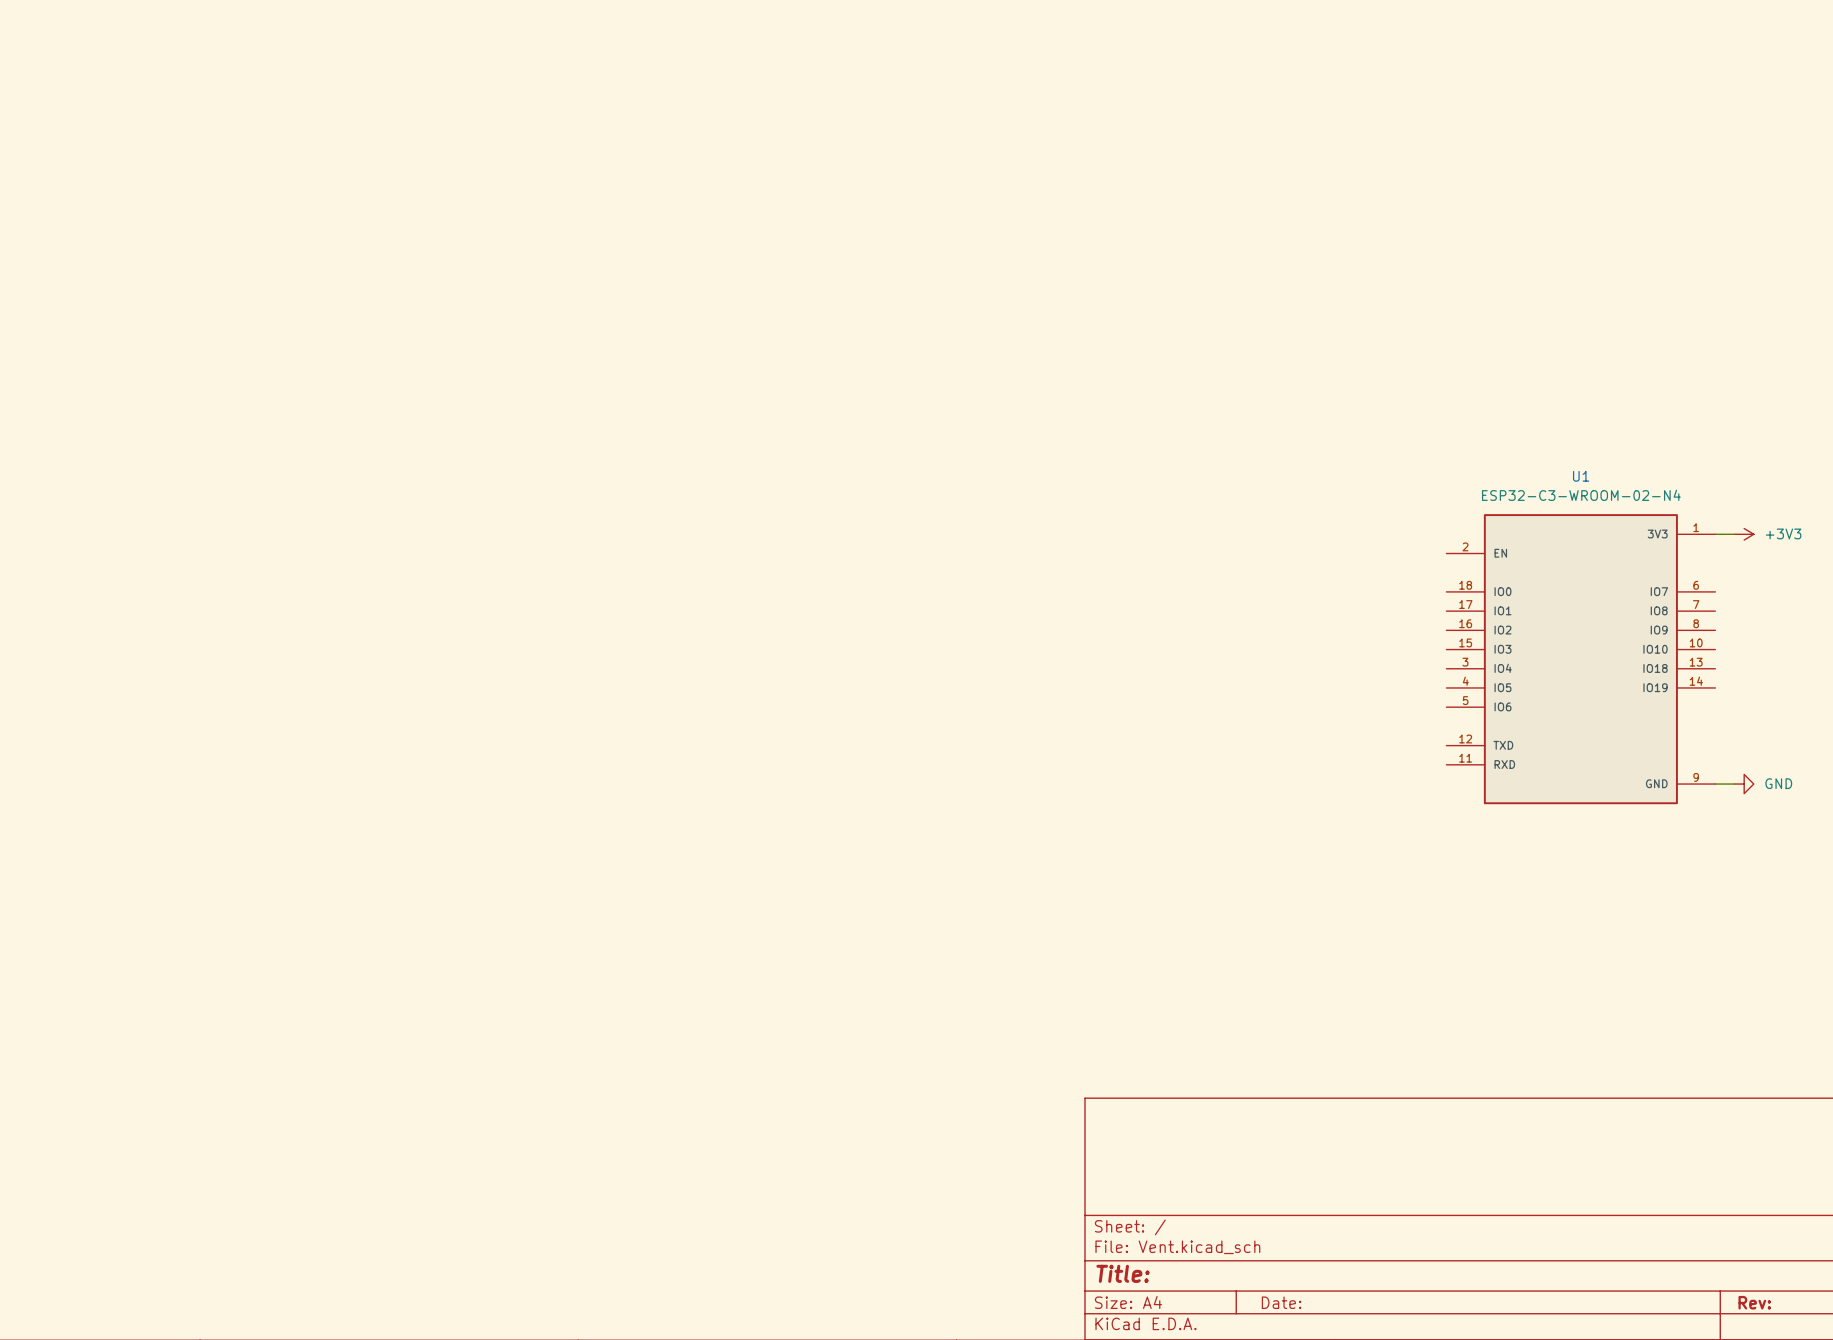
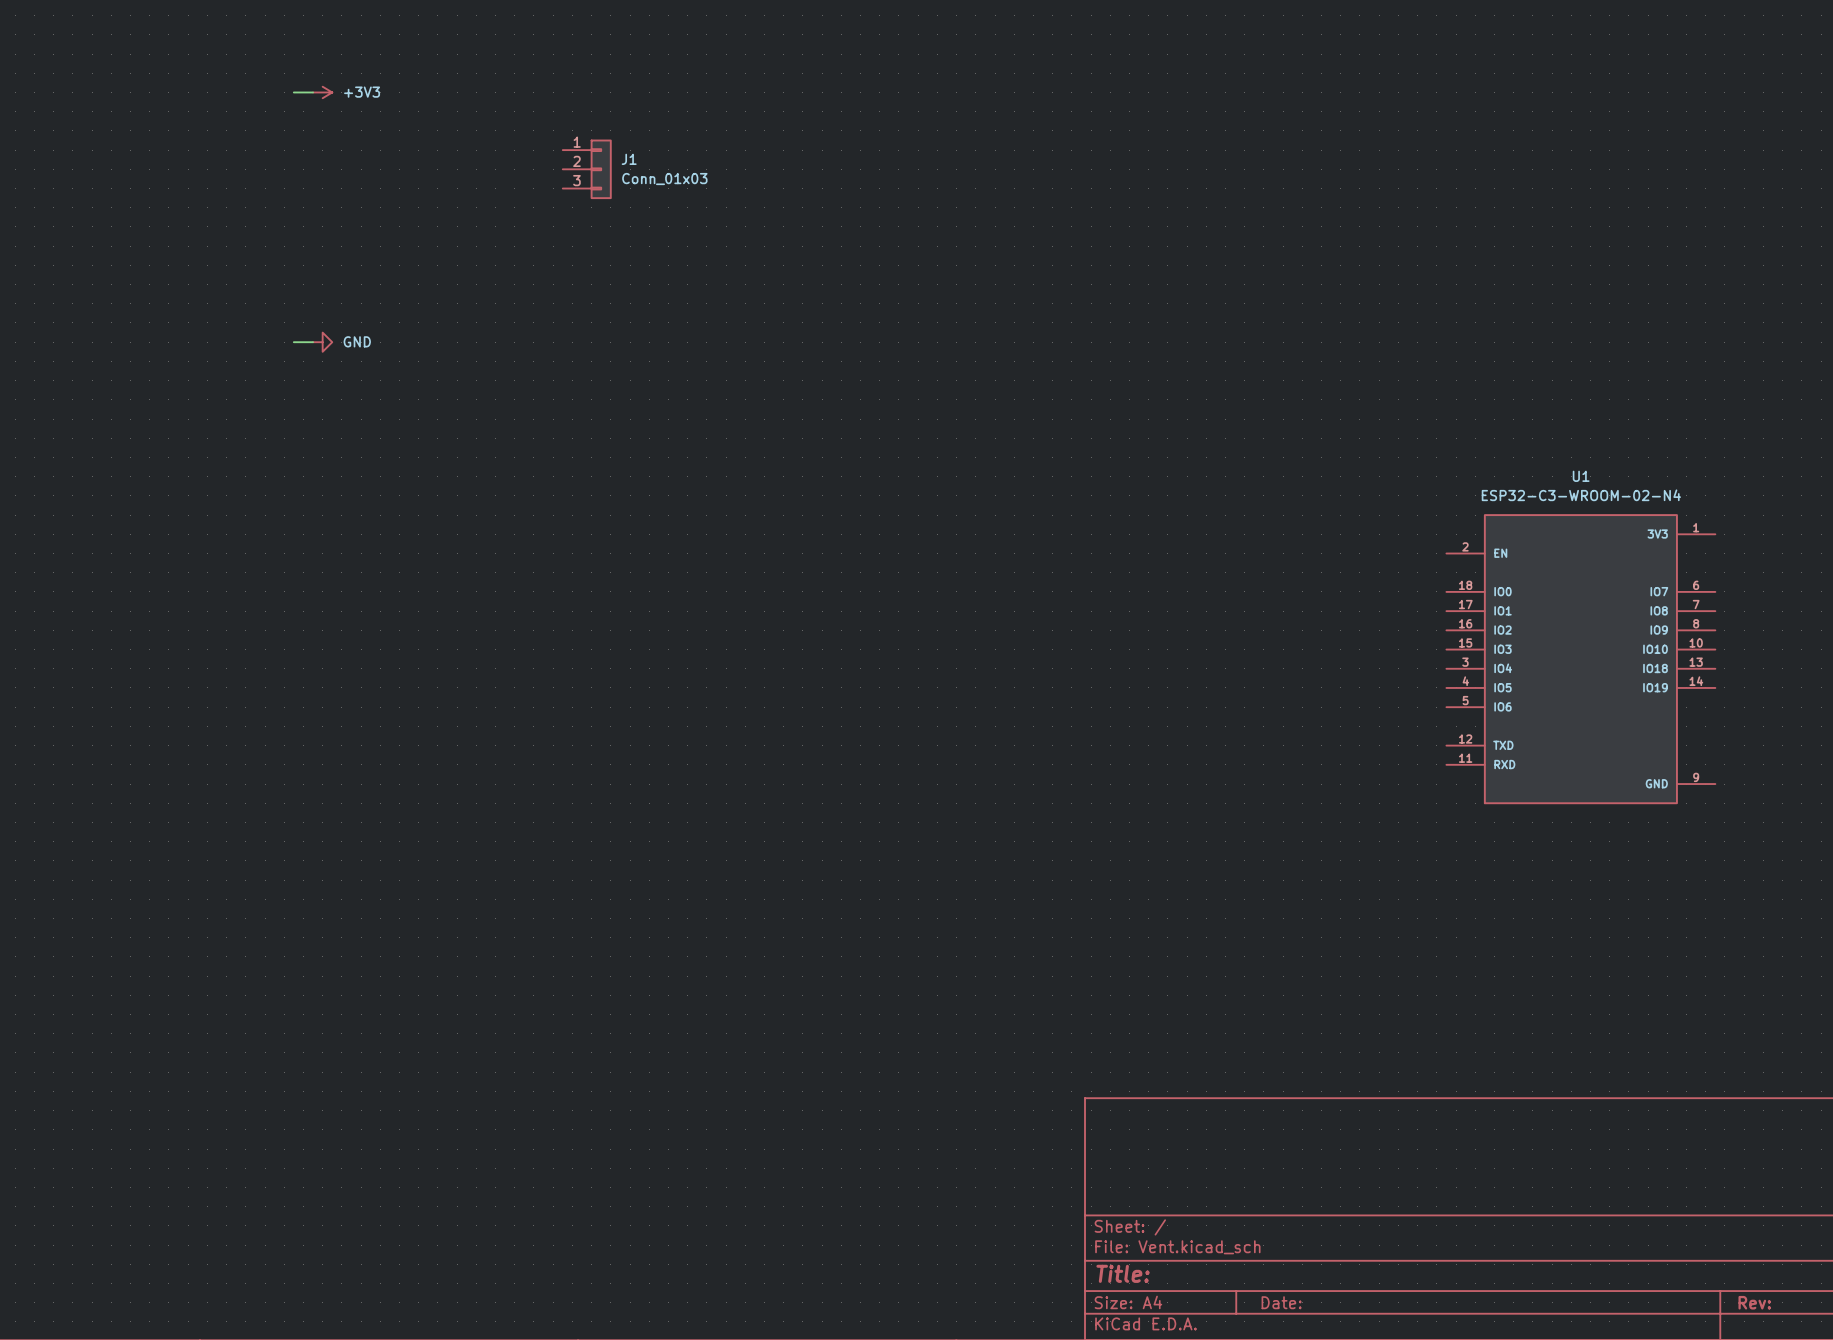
wire: none -> (293, 92) (313, 92)
power symbol: none -> +3V3 (322, 92)
J1: none -> Conn_01x03 (587, 169)
wire: none -> (293, 342) (313, 342)
power symbol: none -> GND (322, 342)
wire: (1715, 534) (1734, 534) -> none
power symbol: +3V3 (1744, 534) -> none
wire: (1715, 784) (1734, 784) -> none
power symbol: GND (1744, 784) -> none

